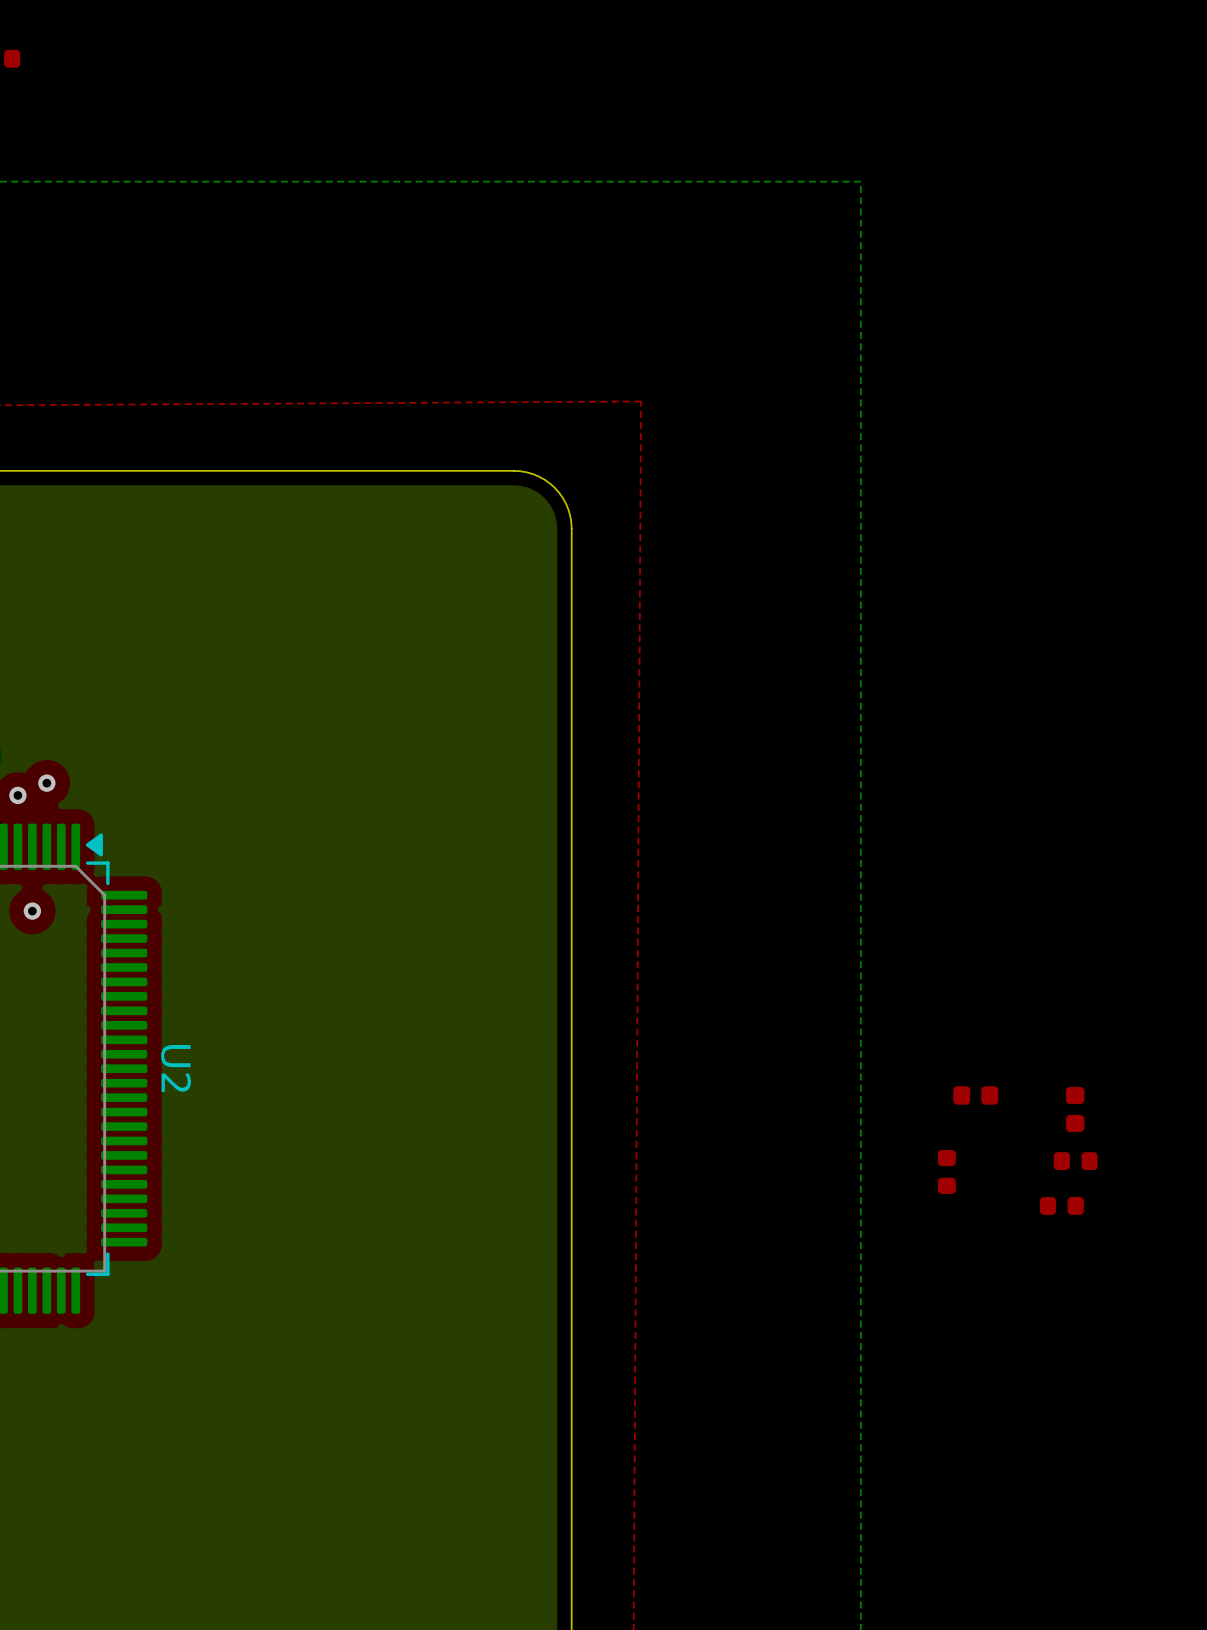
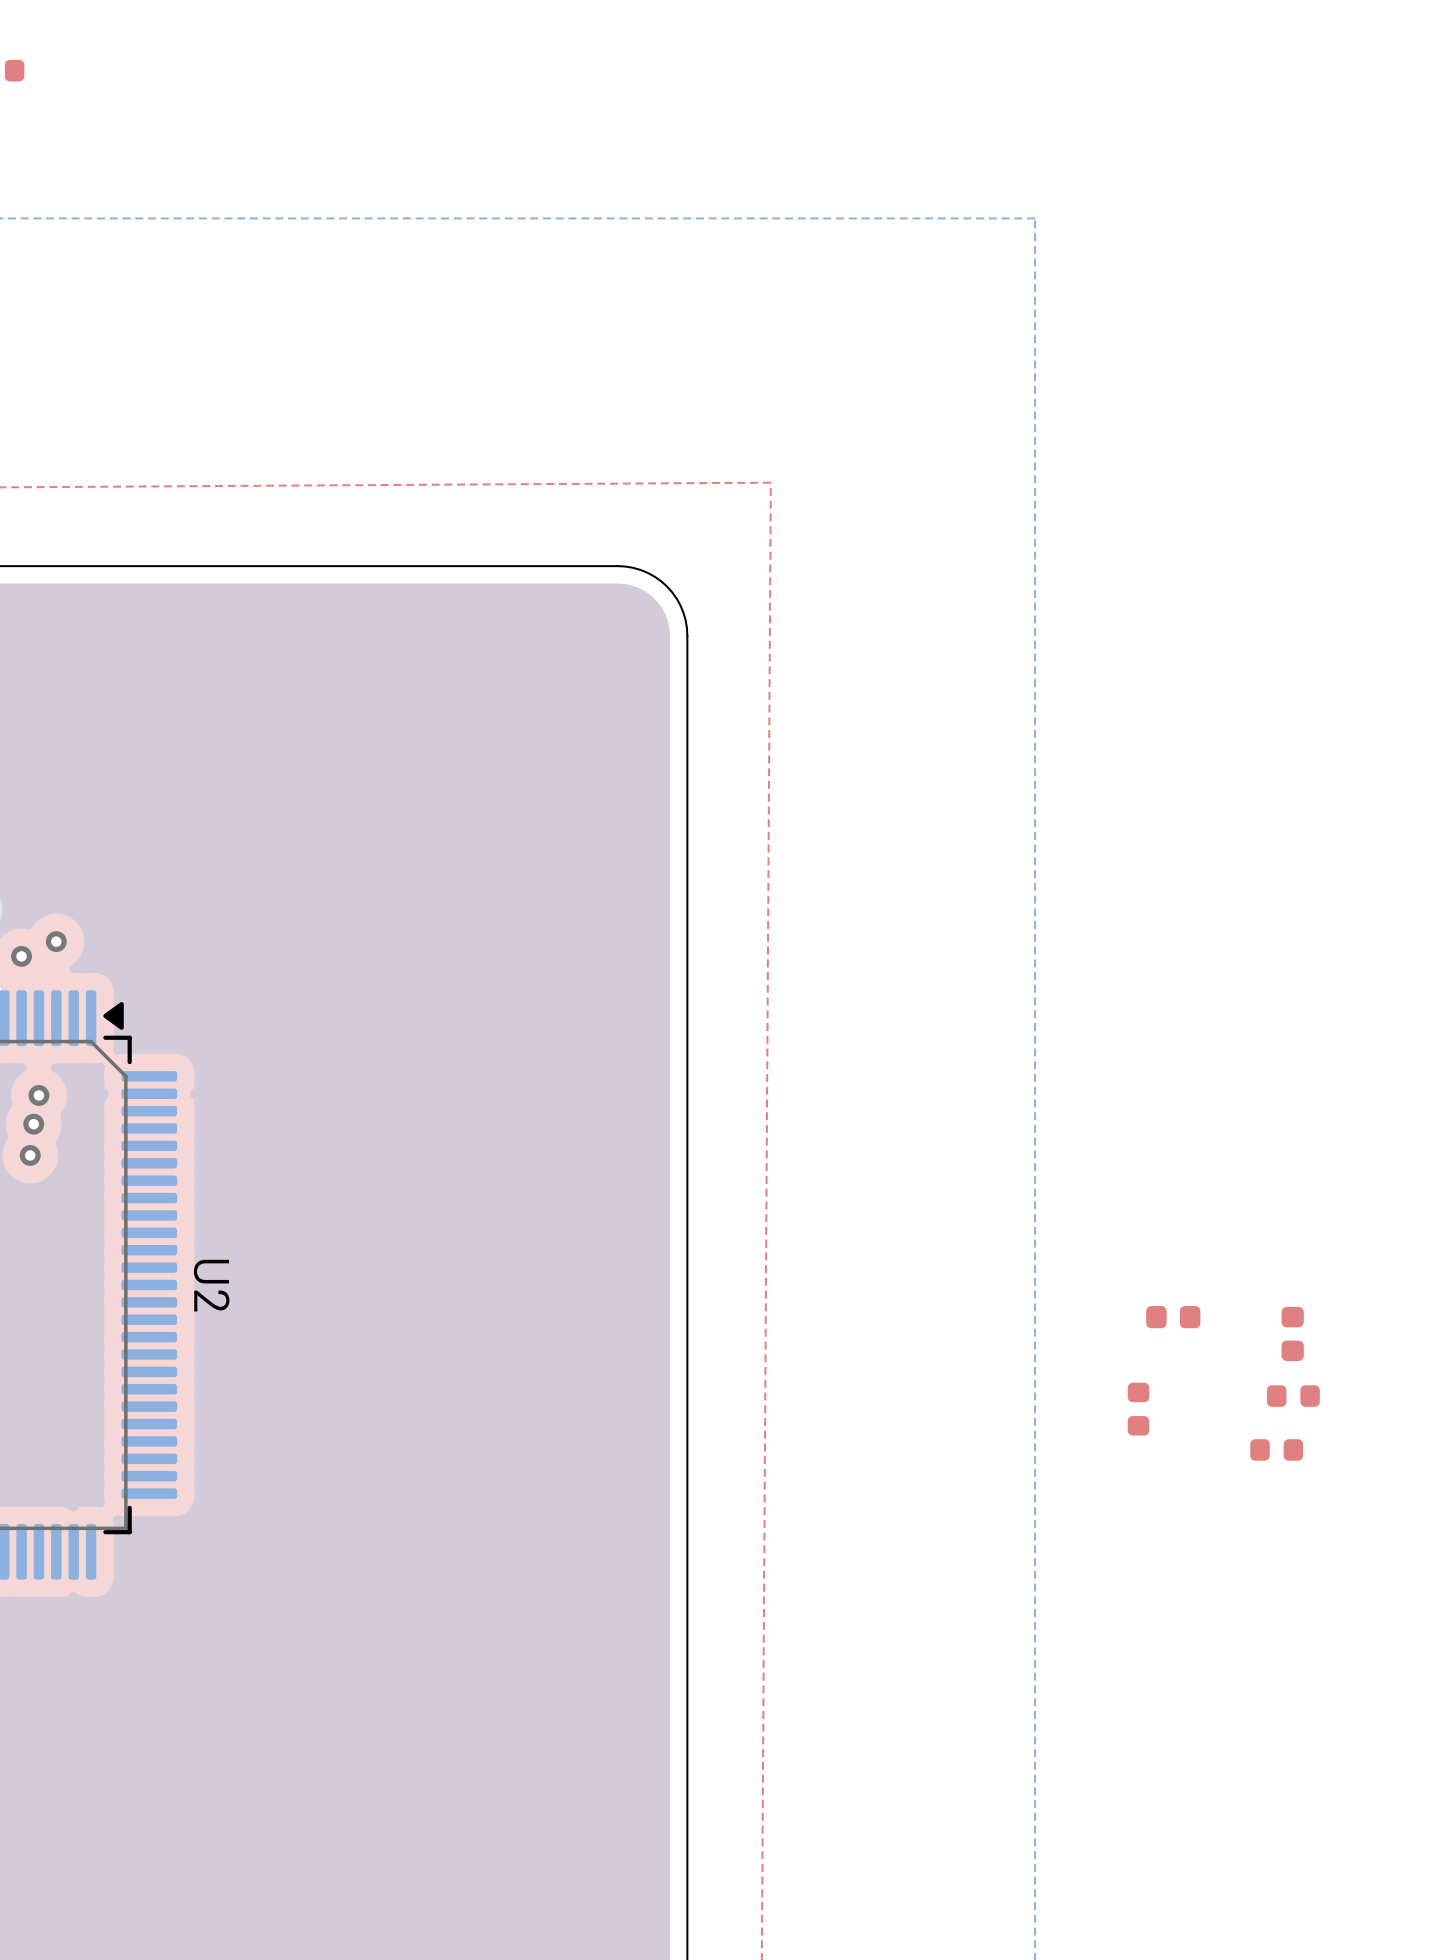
via: none -> (33, 1124)
via: none -> (30, 1155)

